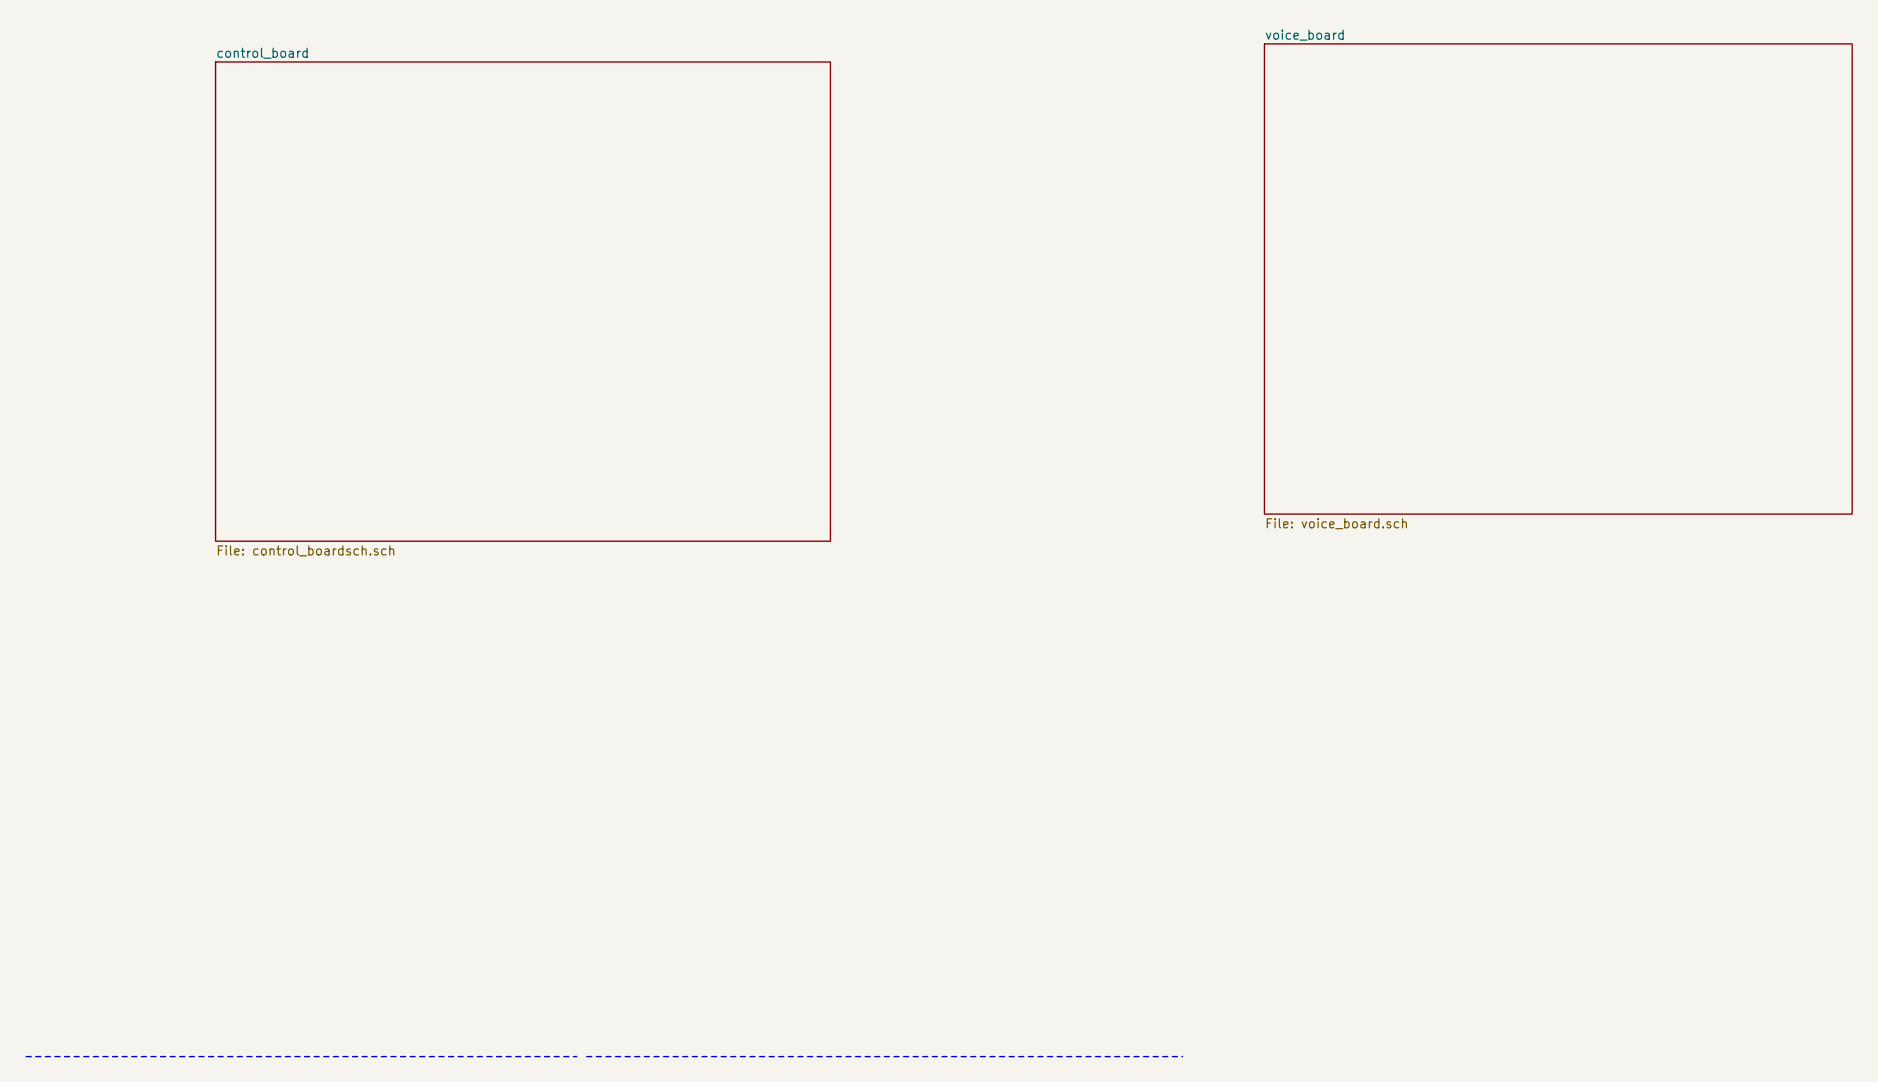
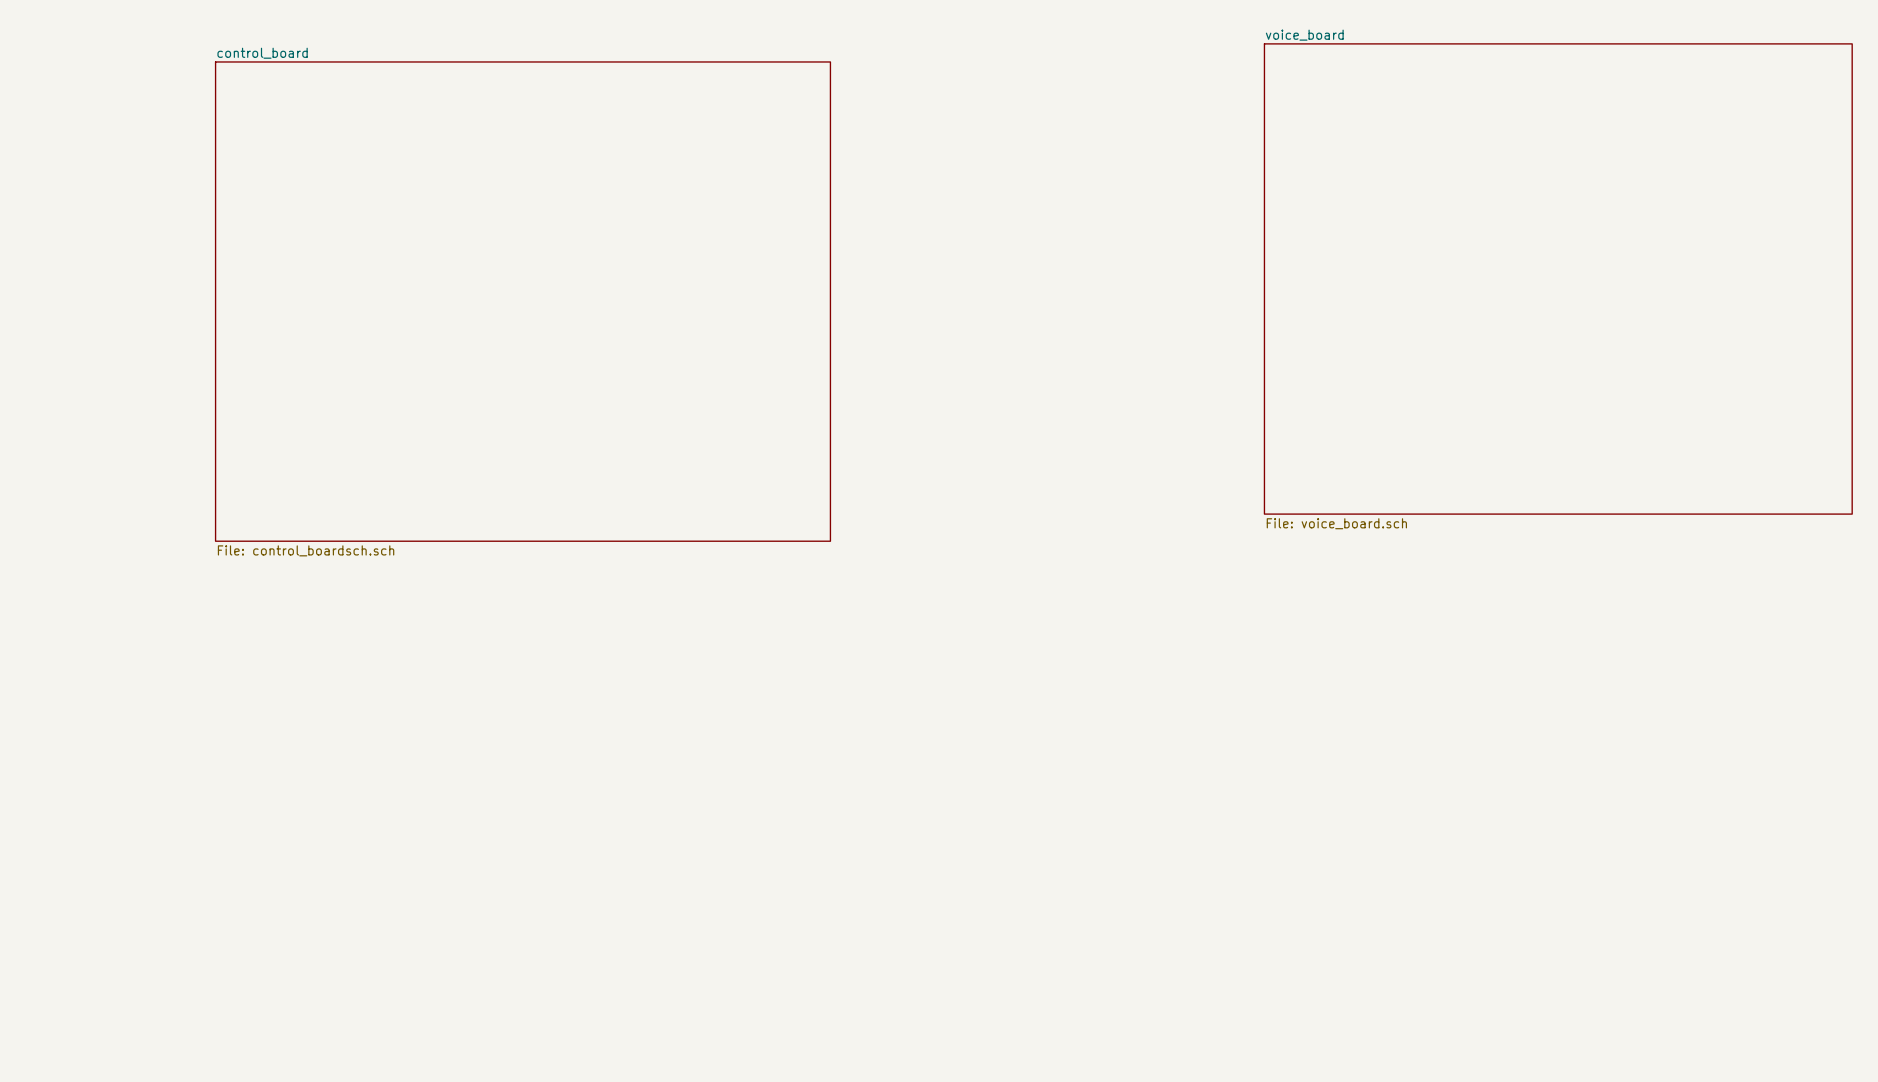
line: (25, 1056) (577, 1056) -> none
line: (586, 1056) (1183, 1056) -> none

